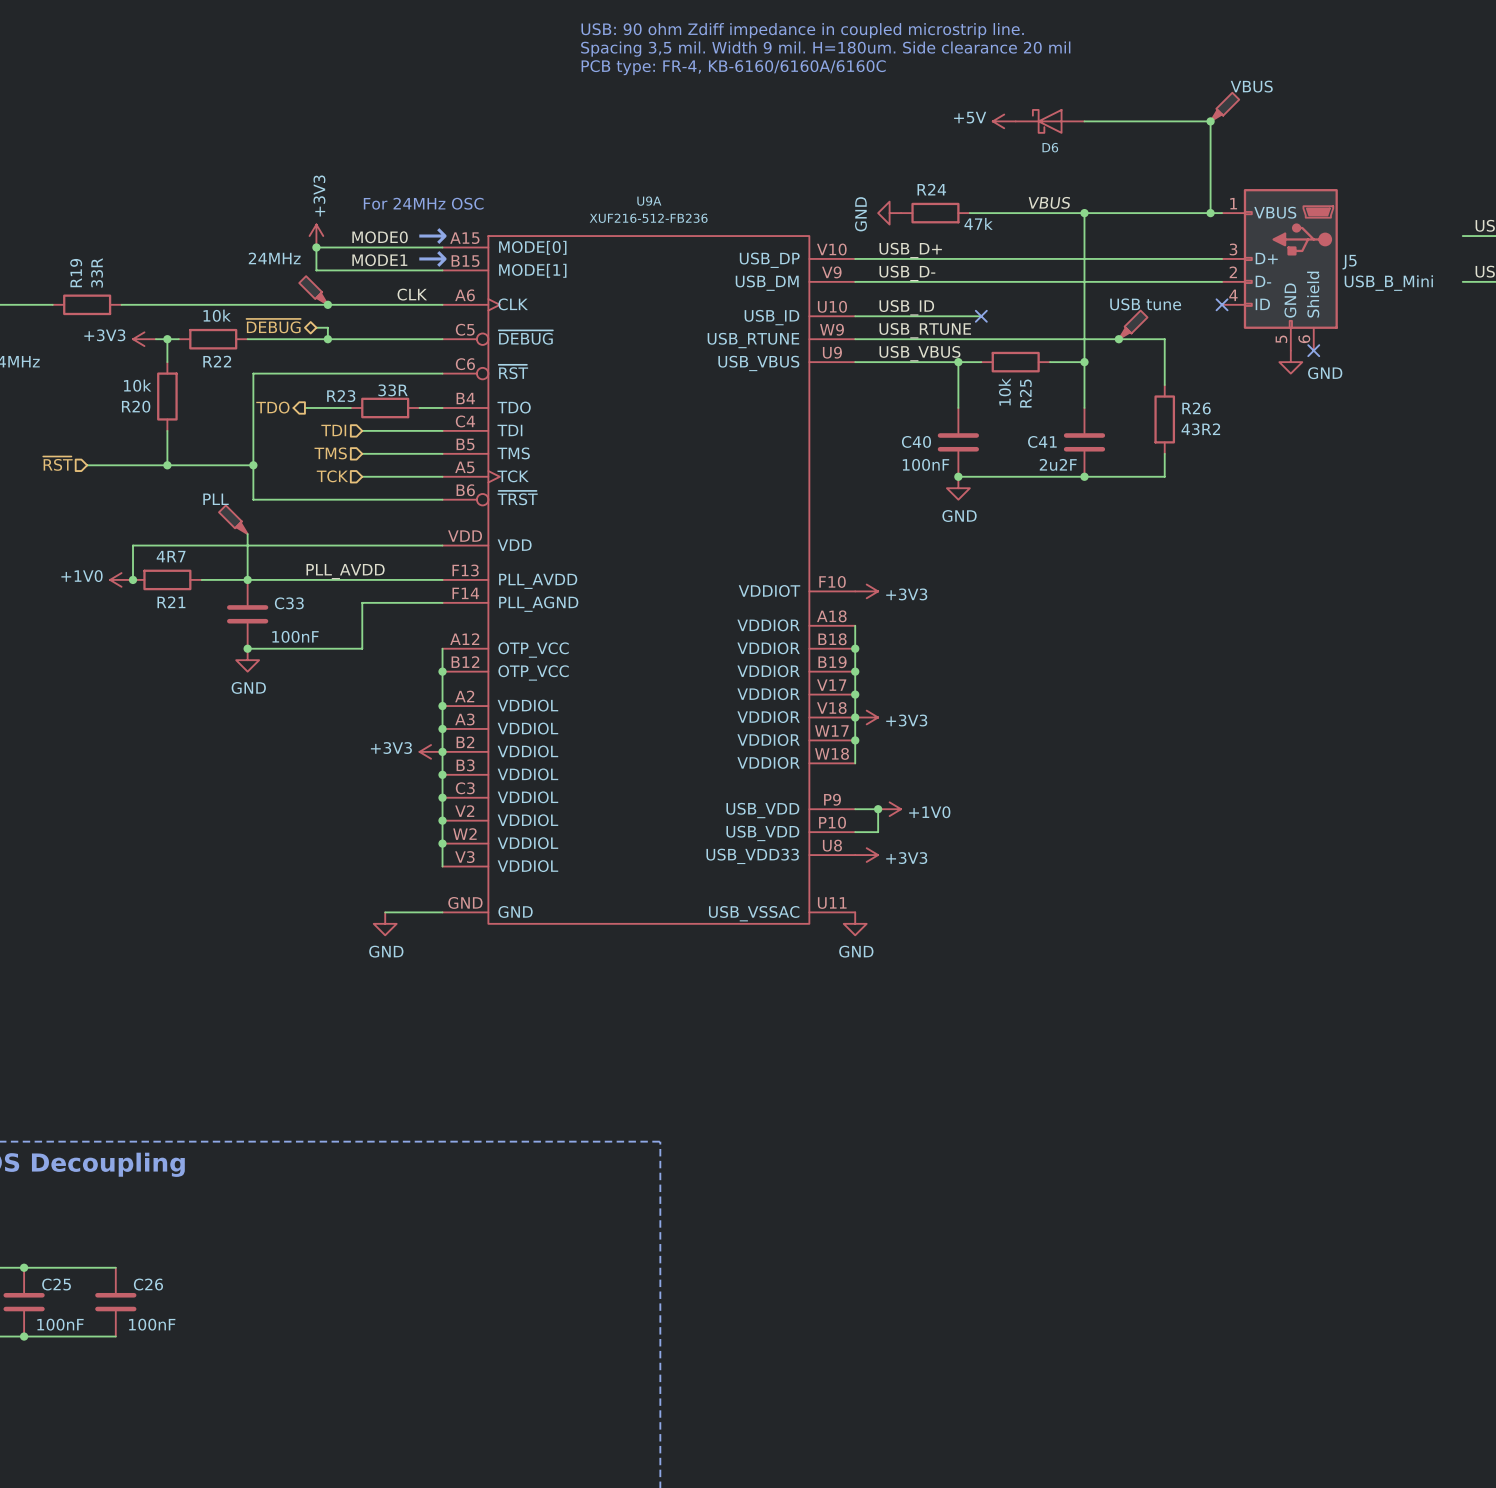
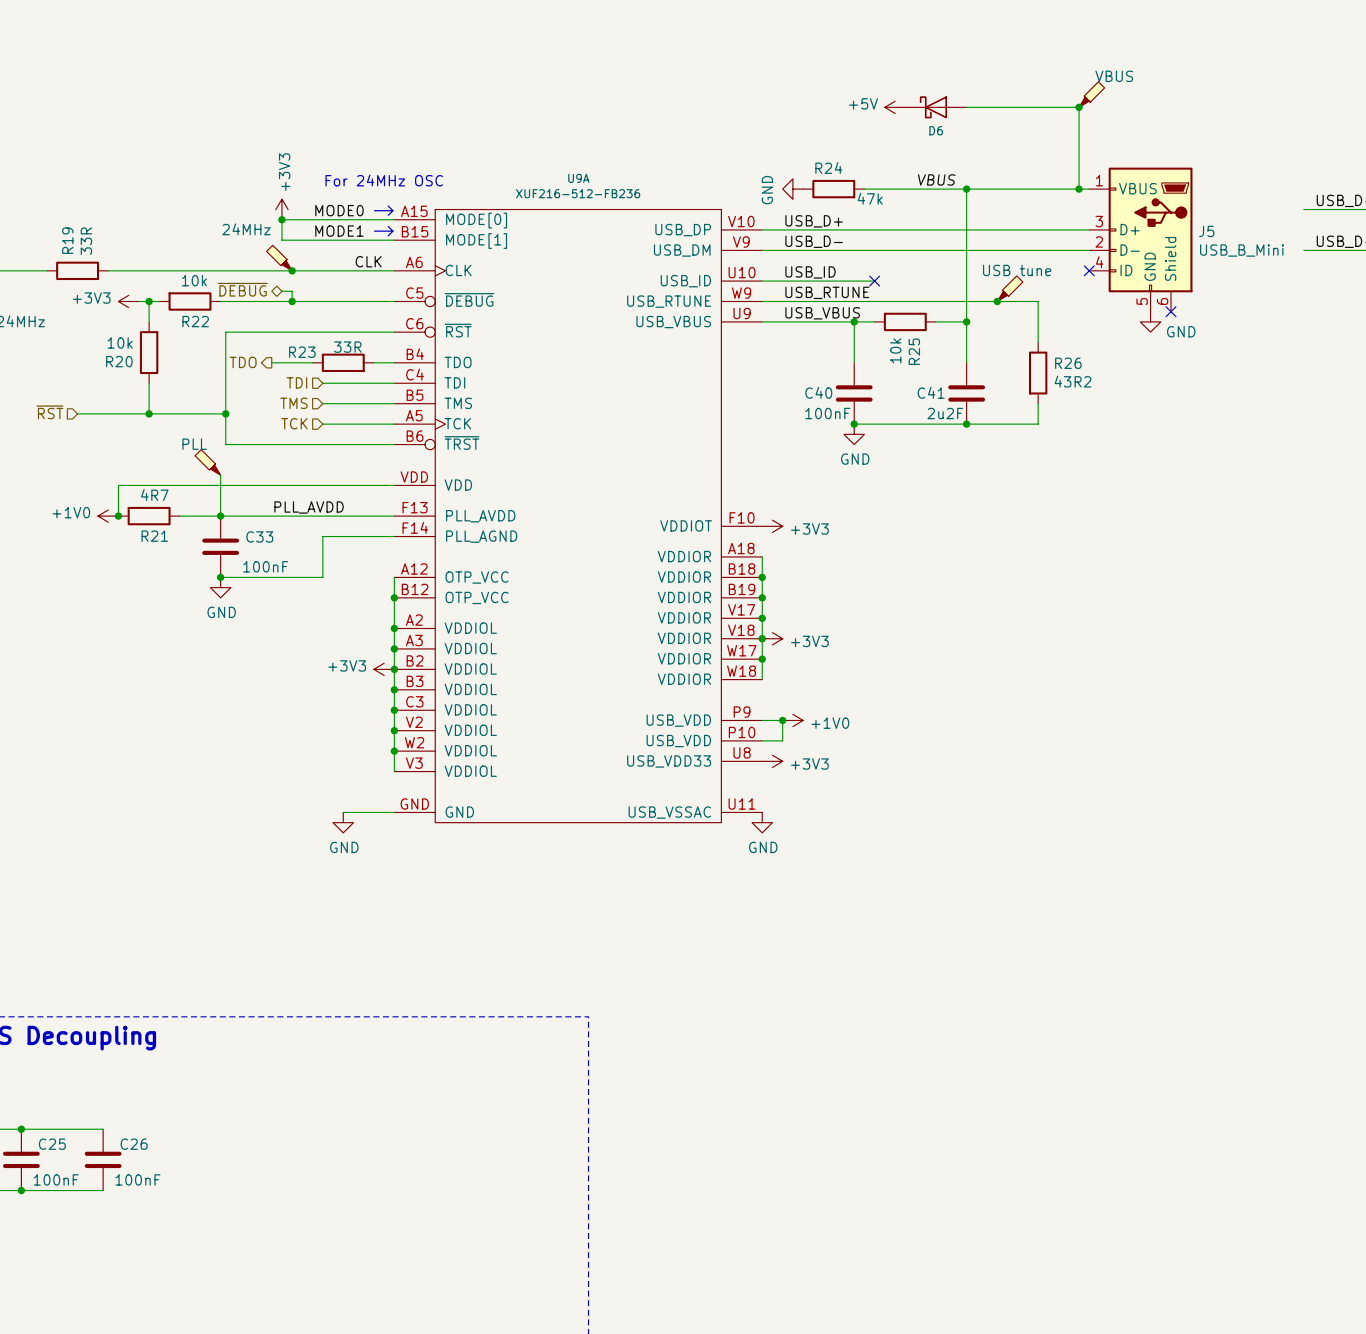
text: USB: 90 ohm Zdiff impedance in coupled microstrip line. (802, 30) -> none
text: Spacing 3,5 mil. Width 9 mil. H=180um. Side clearance 20 mil (825, 49) -> none
text: PCB type: FR-4, KB-6160/6160A/6160C (733, 67) -> none

